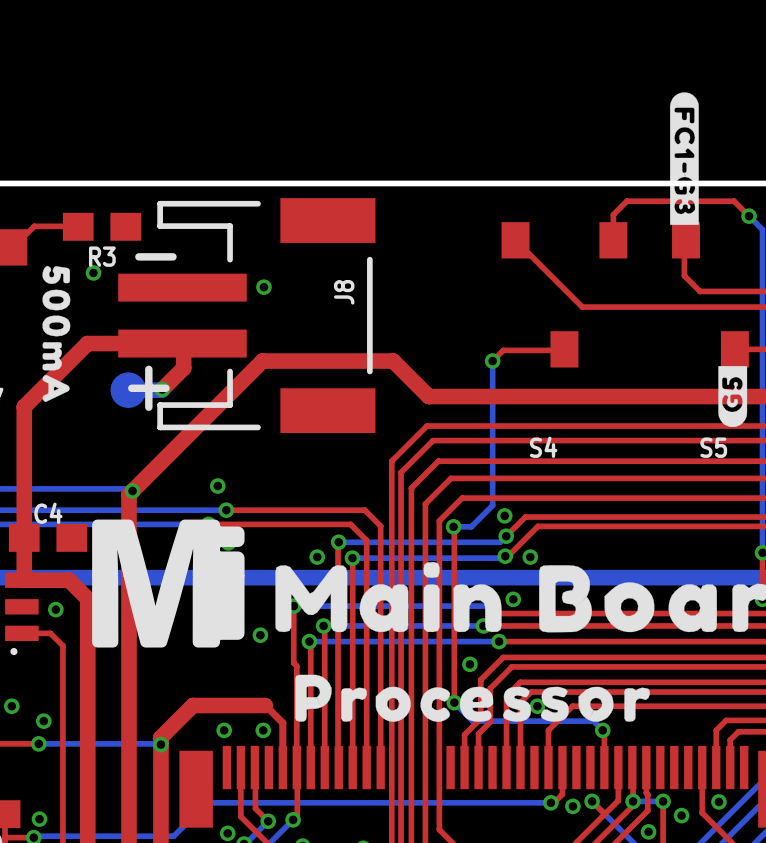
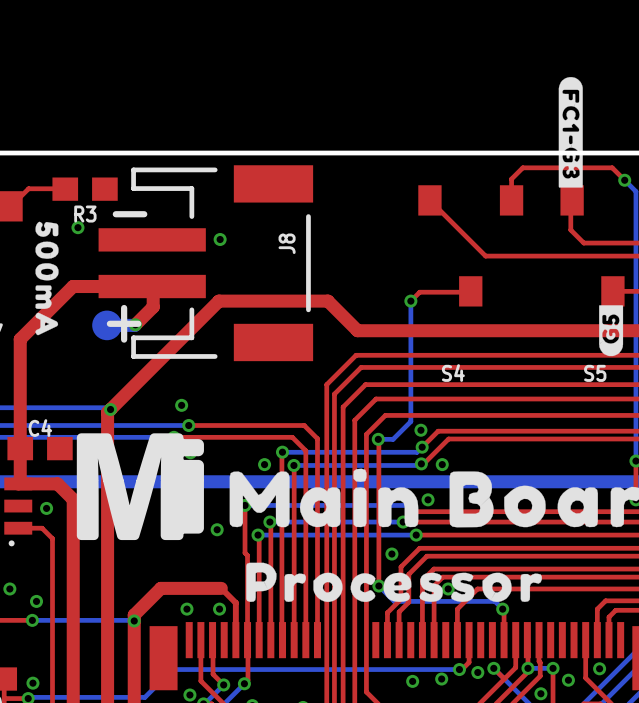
via: none -> (441, 679)
via: none -> (412, 681)

